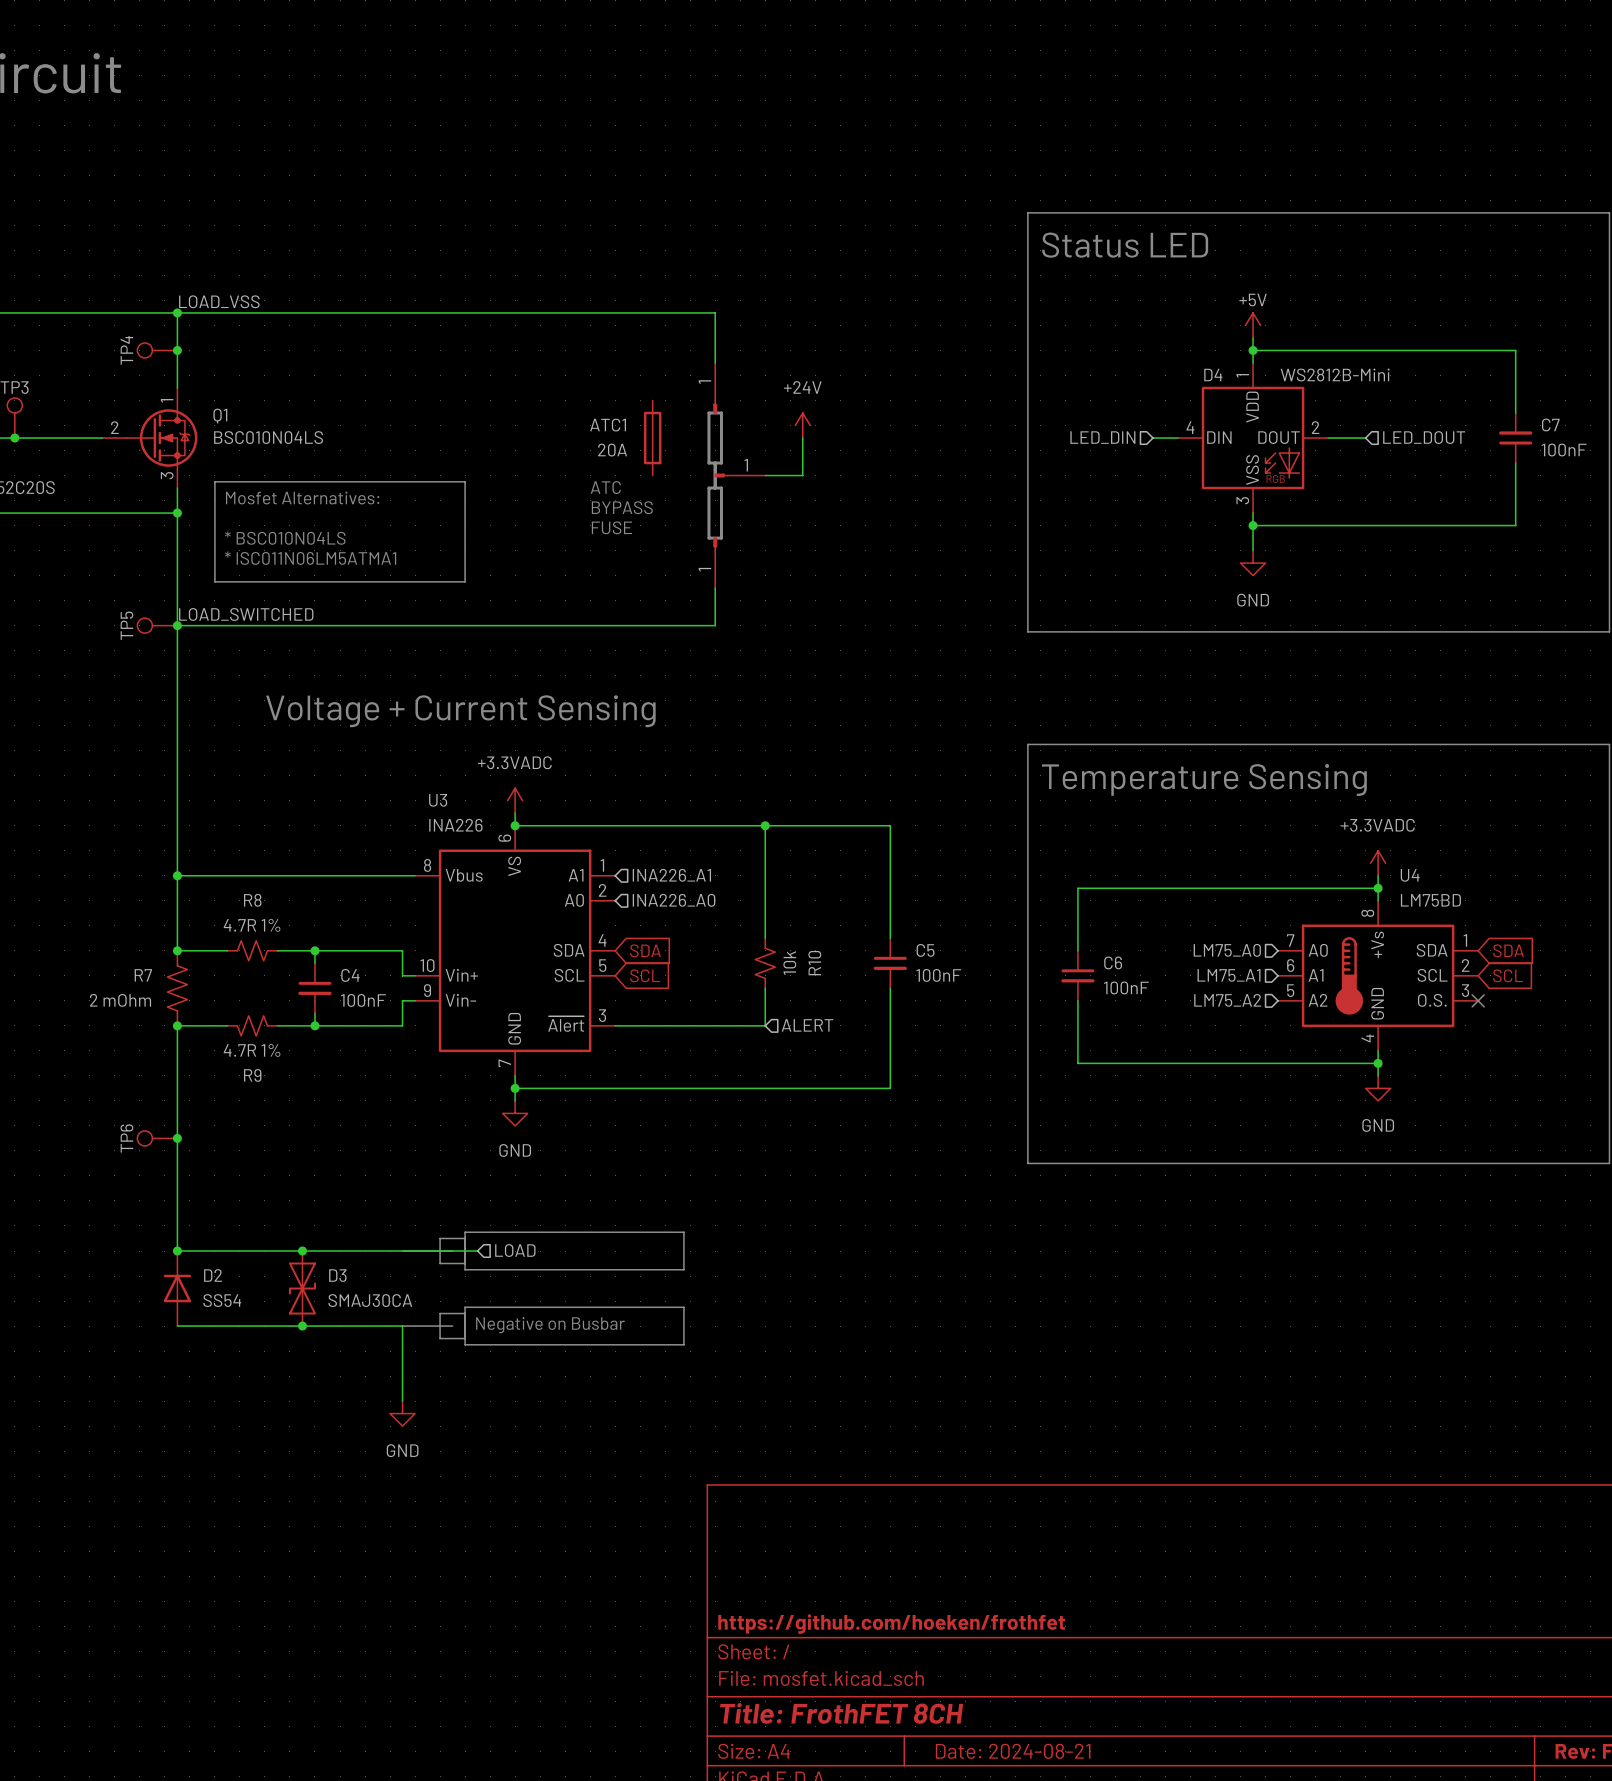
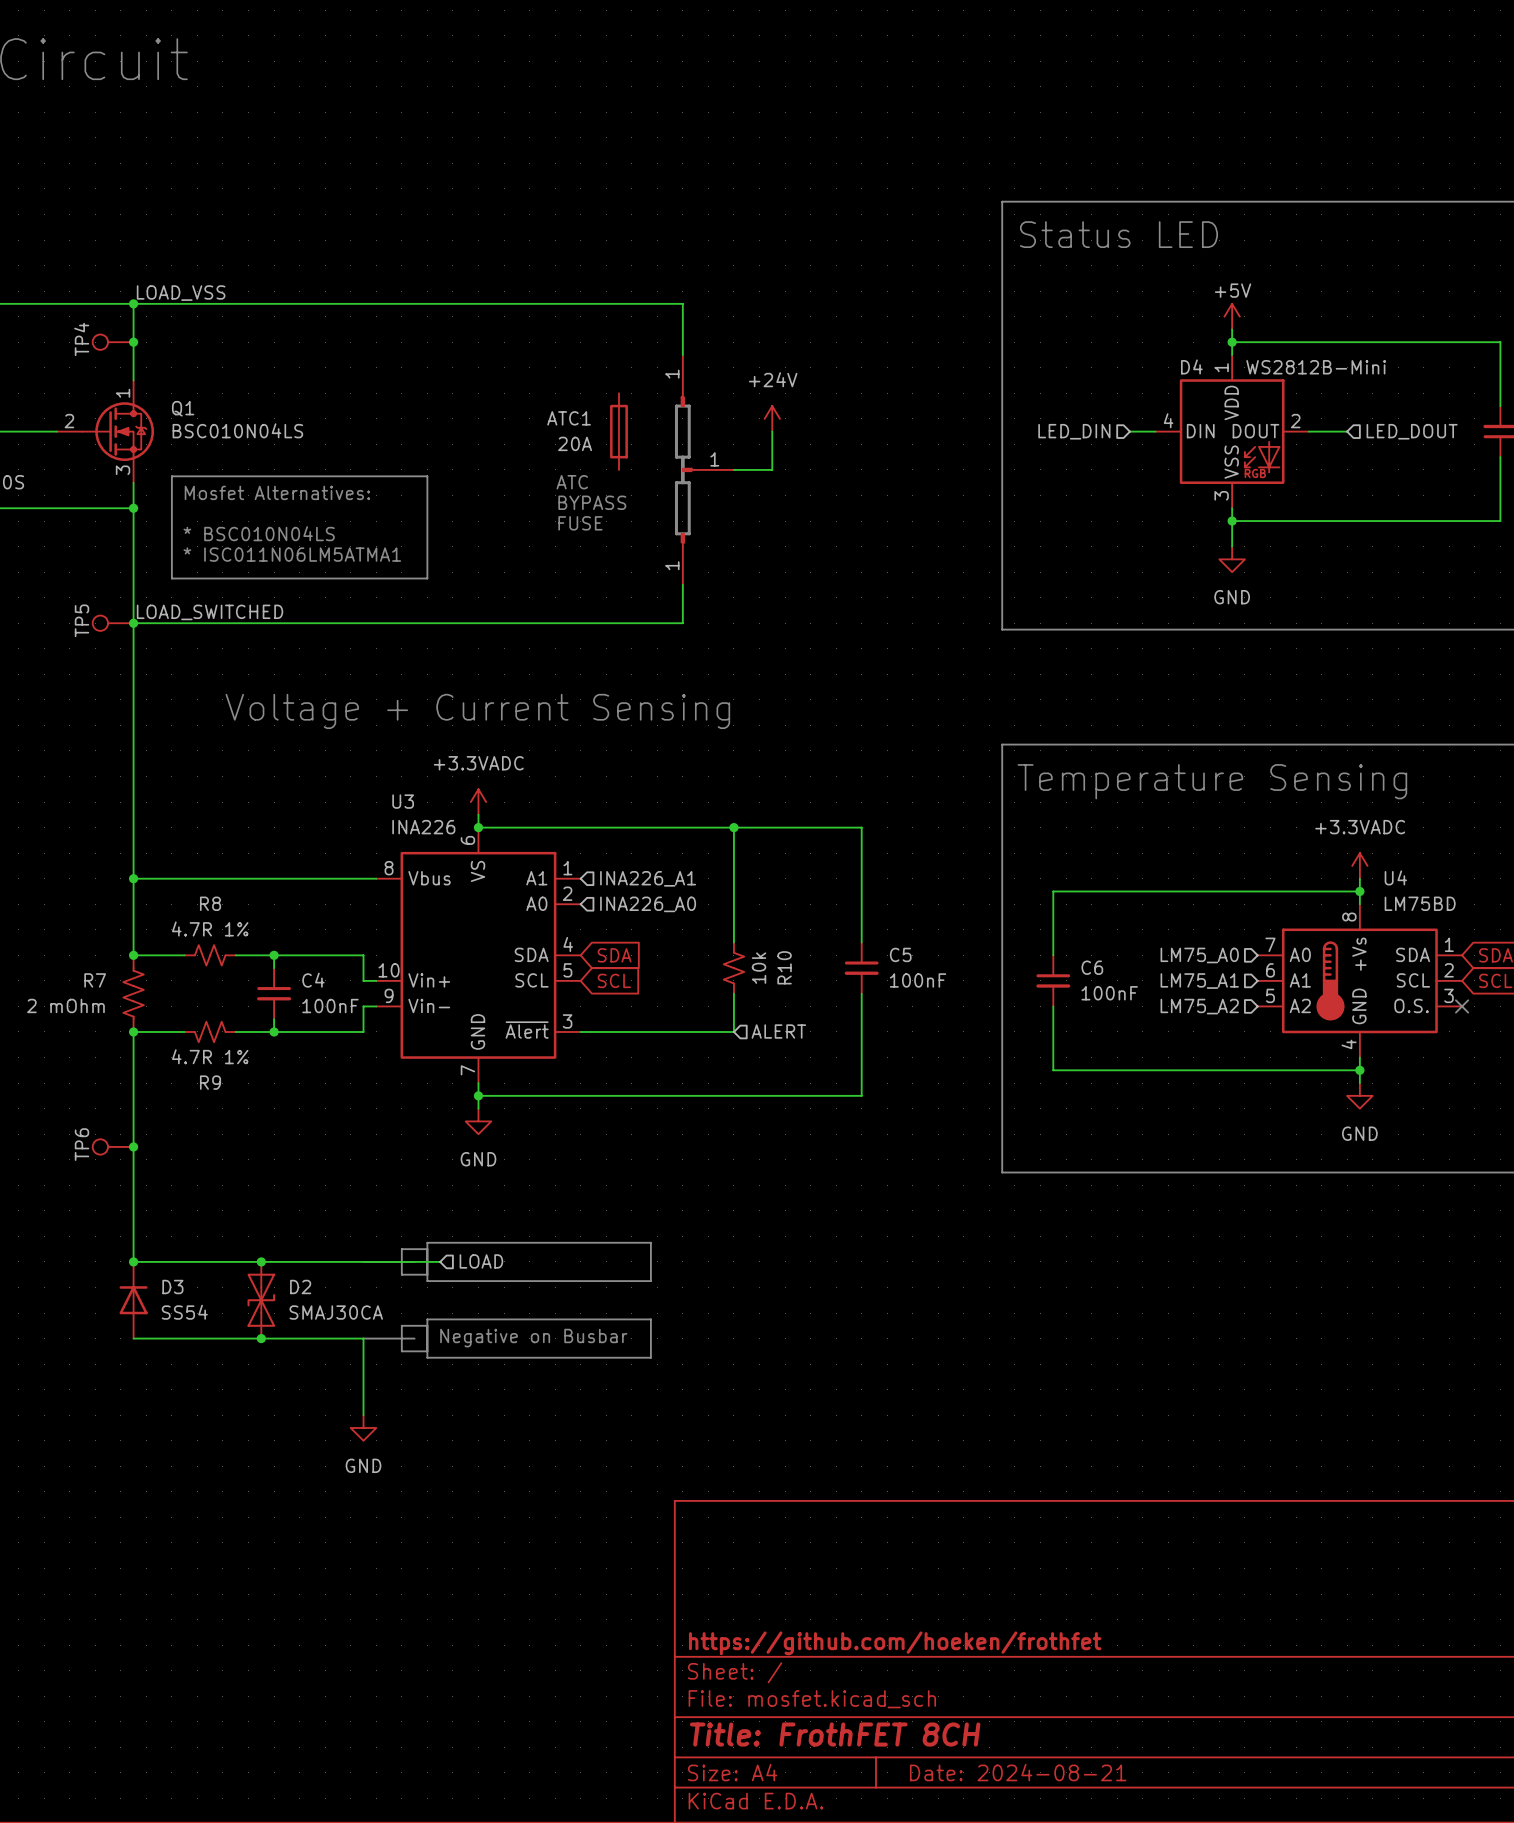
D2 name: D2 (213, 1275) -> D3 (172, 1286)
D3 name: D3 (337, 1275) -> D2 (300, 1286)

